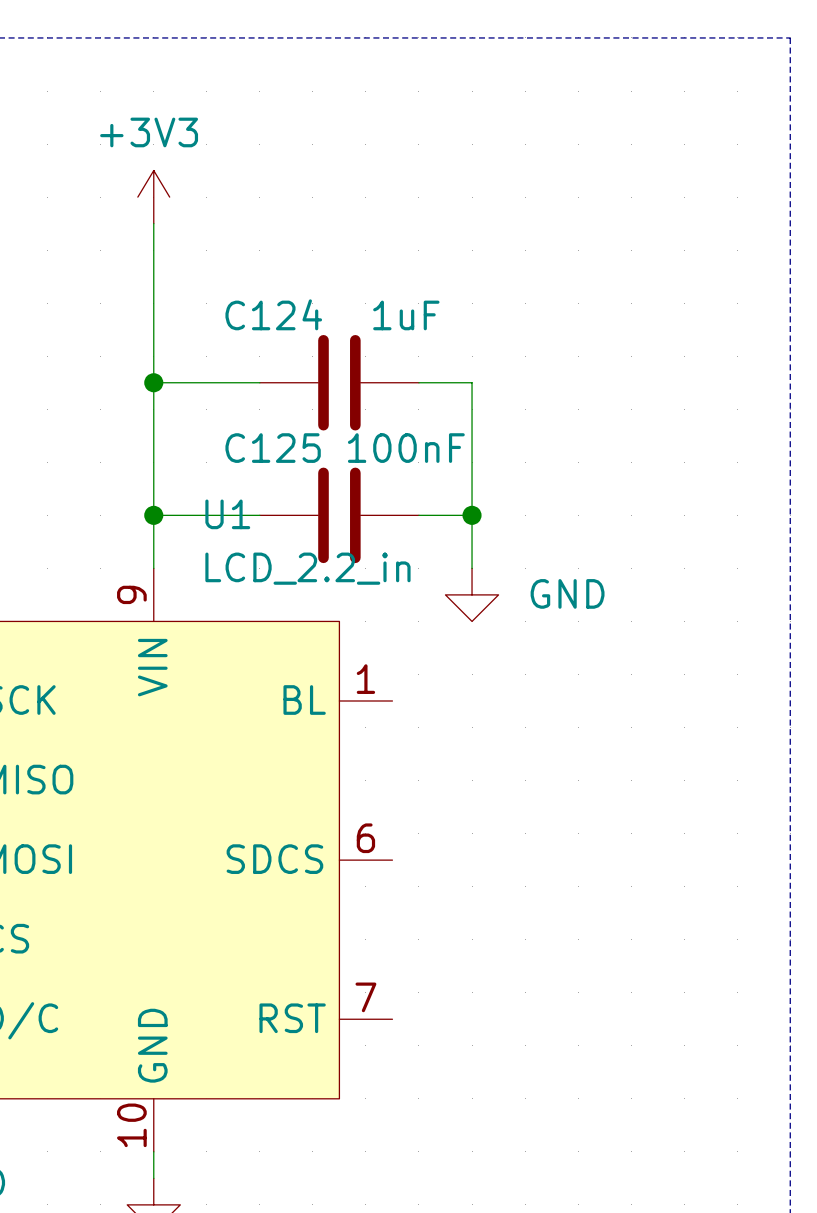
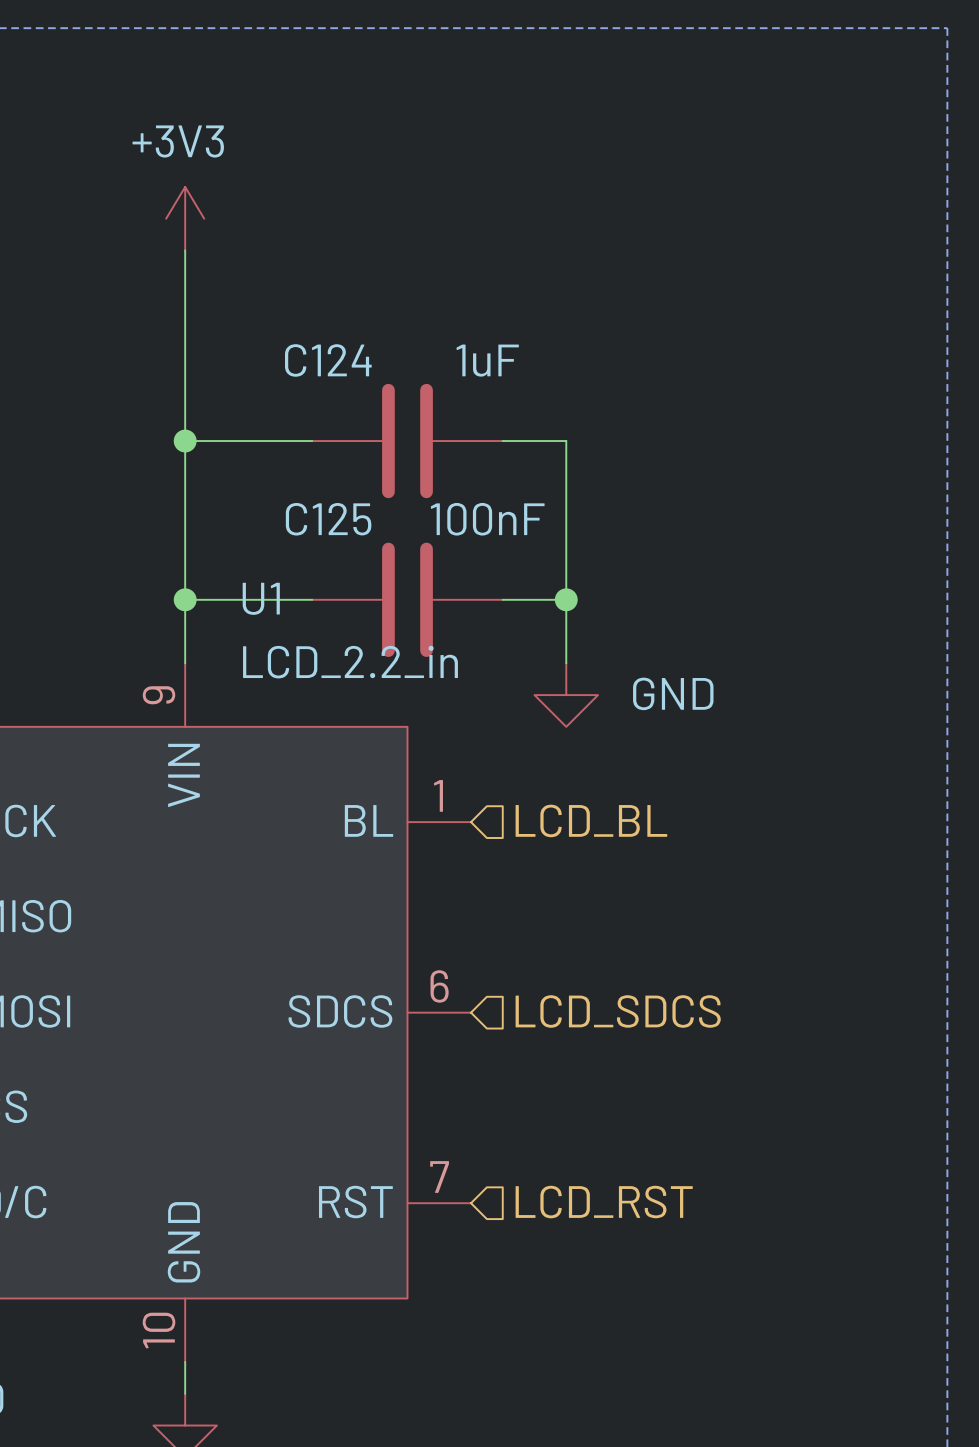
hierarchical label: none -> LCD_BL (591, 820)
hierarchical label: none -> LCD_SDCS (618, 1011)
hierarchical label: none -> LCD_RST (604, 1202)

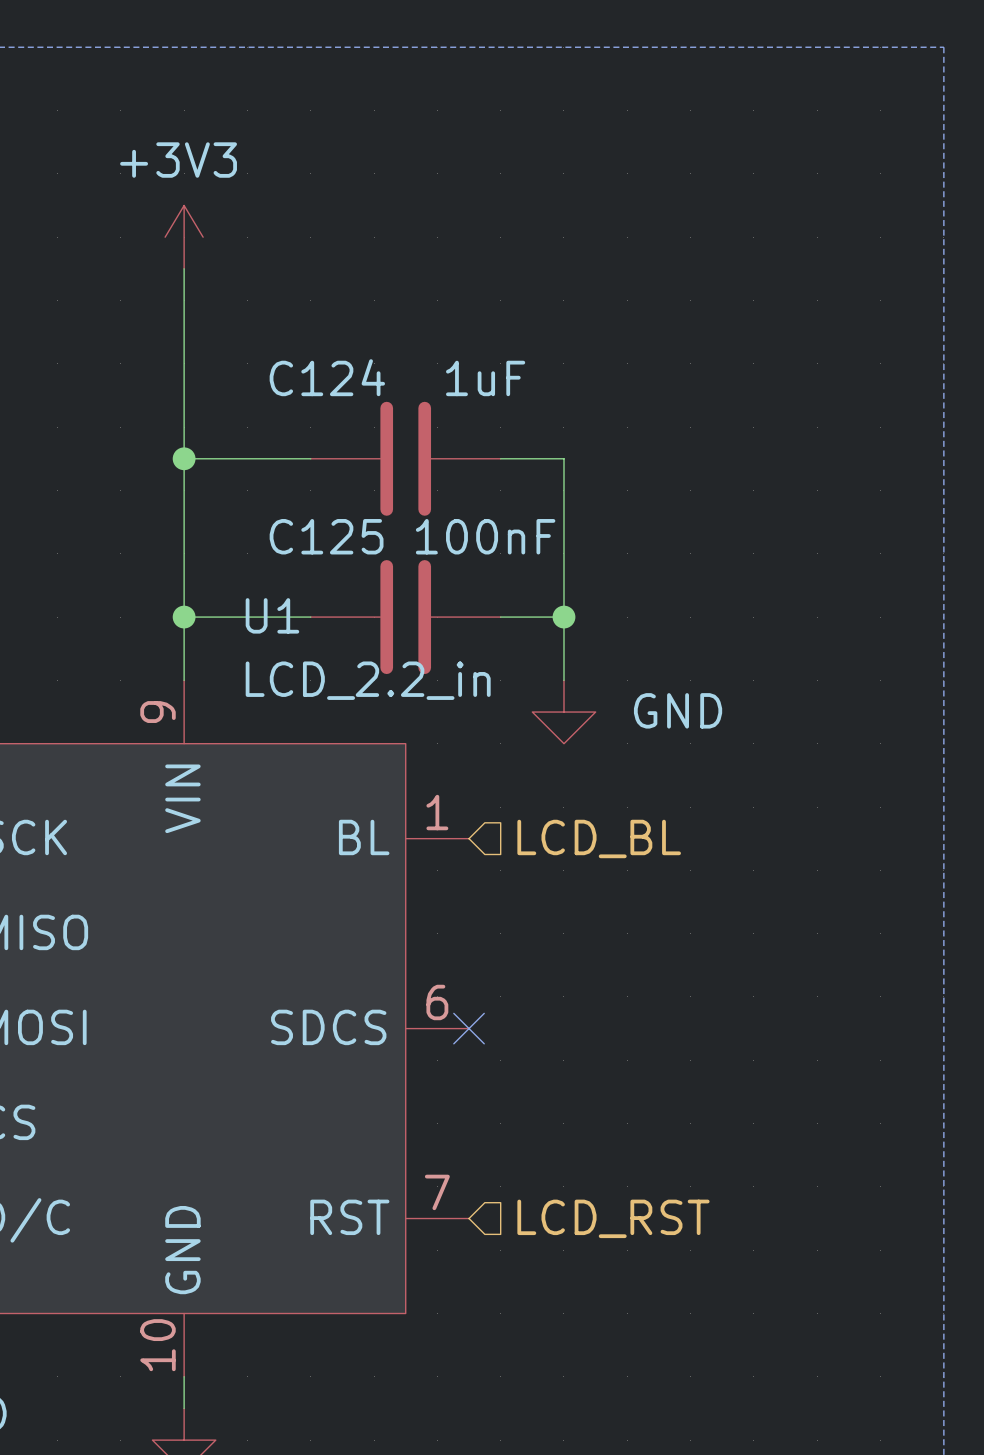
hierarchical label: LCD_SDCS (618, 1011) -> none
no-connect mark: none -> (469, 1028)

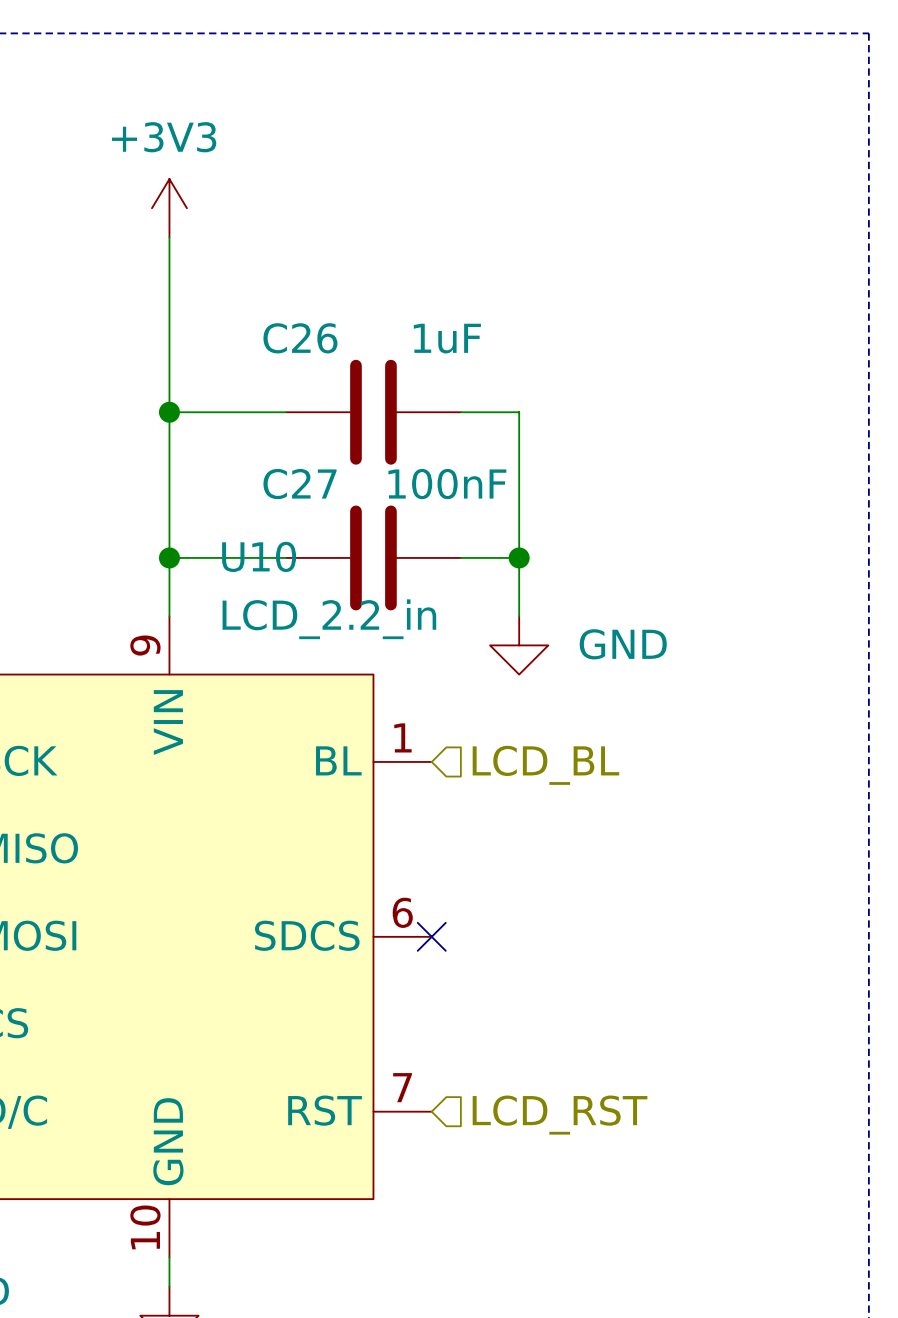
C124 name: C124 (327, 377) -> C26 (300, 338)
C125 name: C125 (326, 536) -> C27 (300, 484)
U1 name: U1 (272, 615) -> U10 (259, 556)

